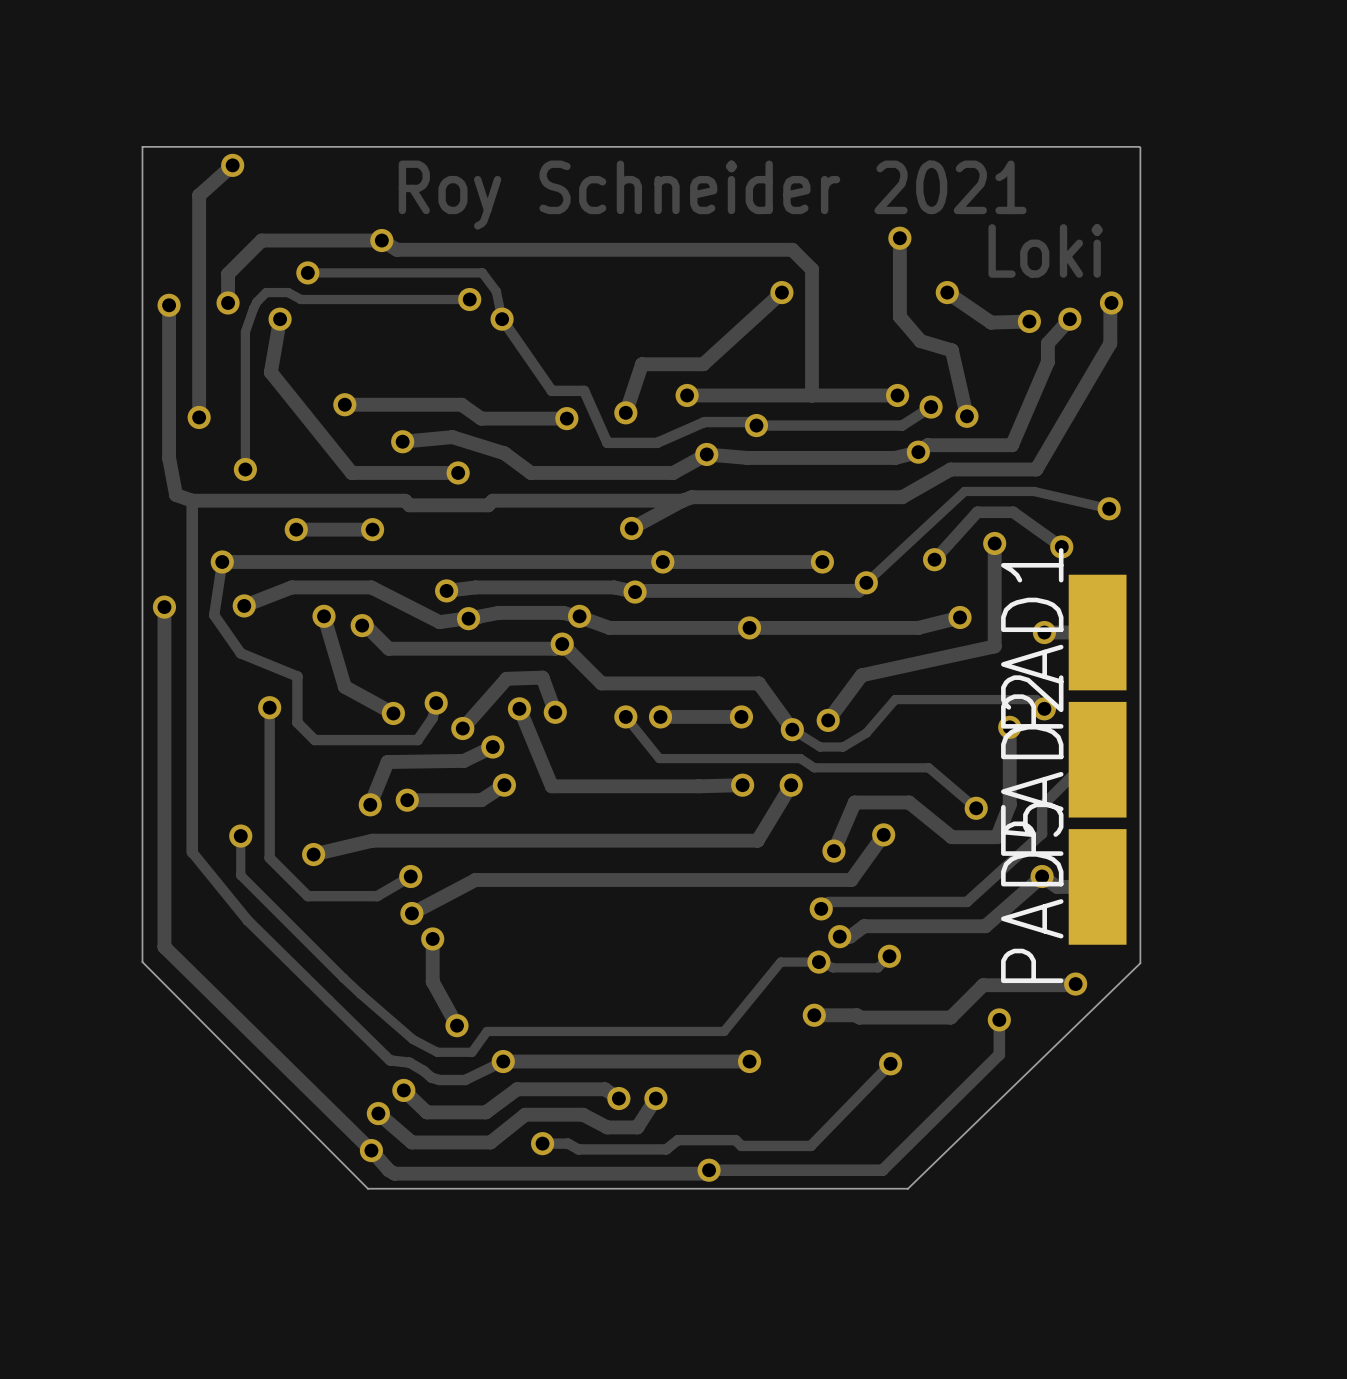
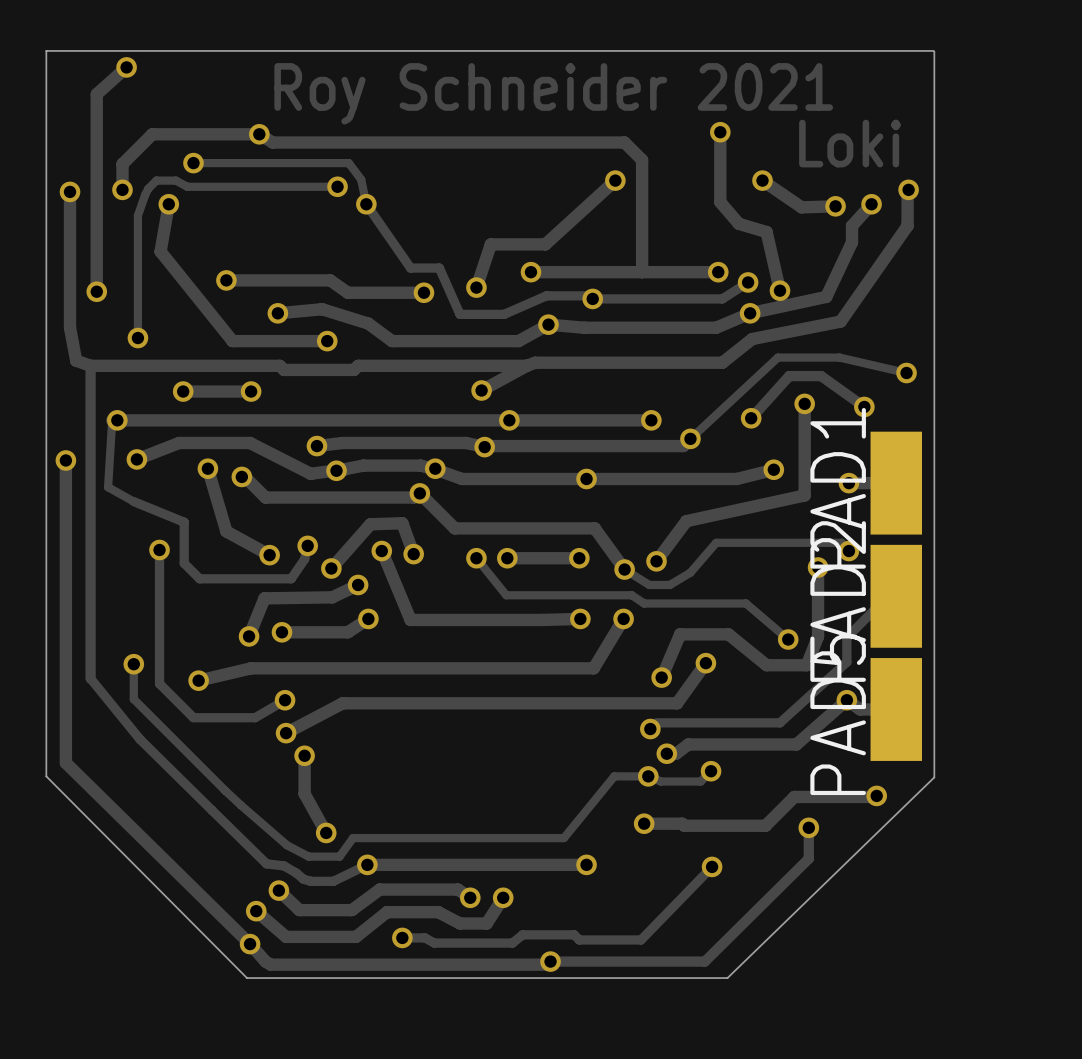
track: (1110, 343) (1036, 469) (950, 469) (902, 497) -> (907, 225) (840, 321) (752, 339) (722, 362)
track: (1047, 361) (1012, 445) (927, 445) (918, 452) (895, 457) -> (852, 242) (826, 296) (750, 313) (716, 327)
via position: (918, 452) -> (750, 313)
track: (222, 561) (214, 615) (240, 653) -> (117, 420) (112, 420) (108, 487) (133, 501)

